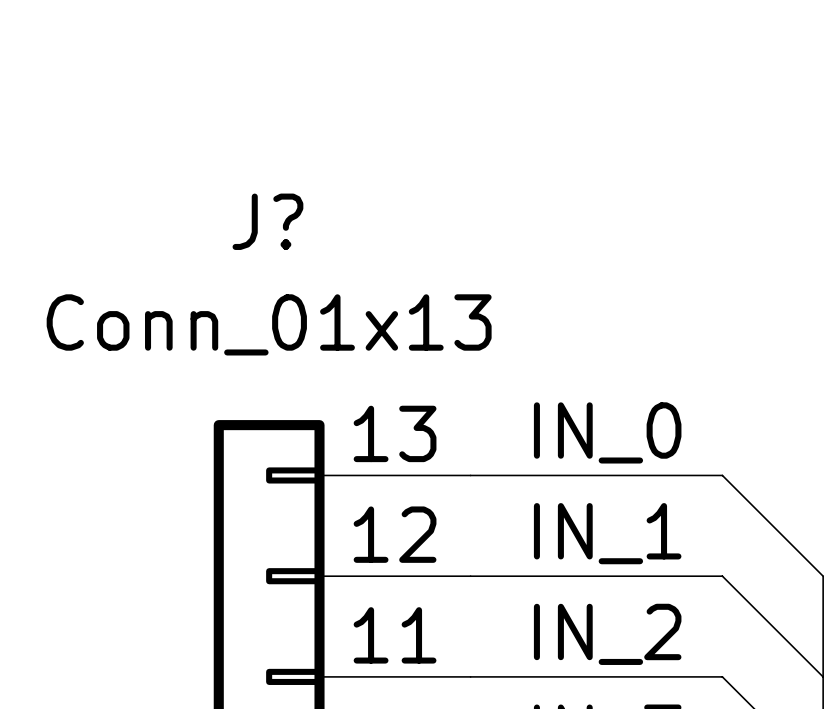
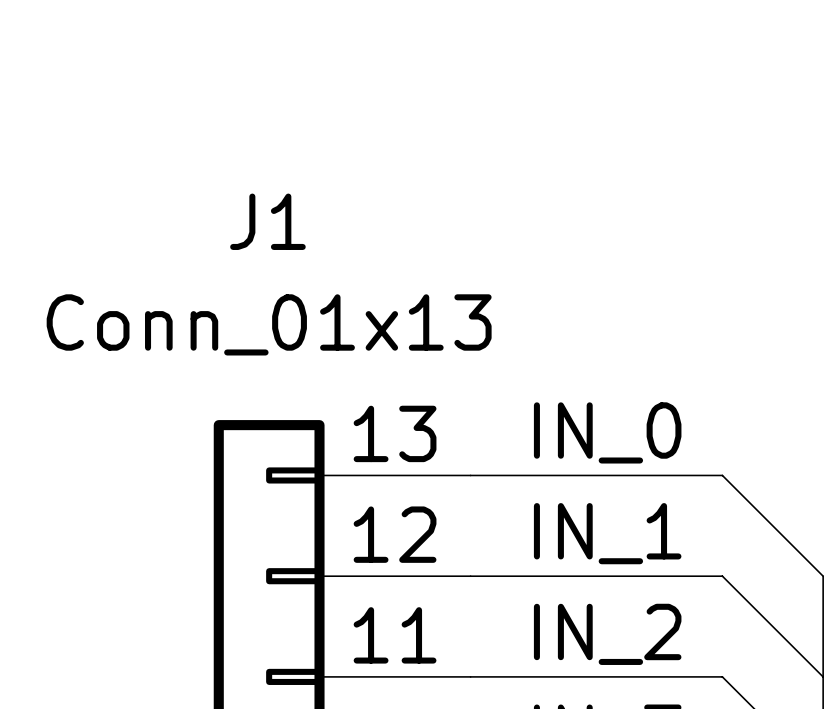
J? name: J? (267, 221) -> J1 (267, 221)

